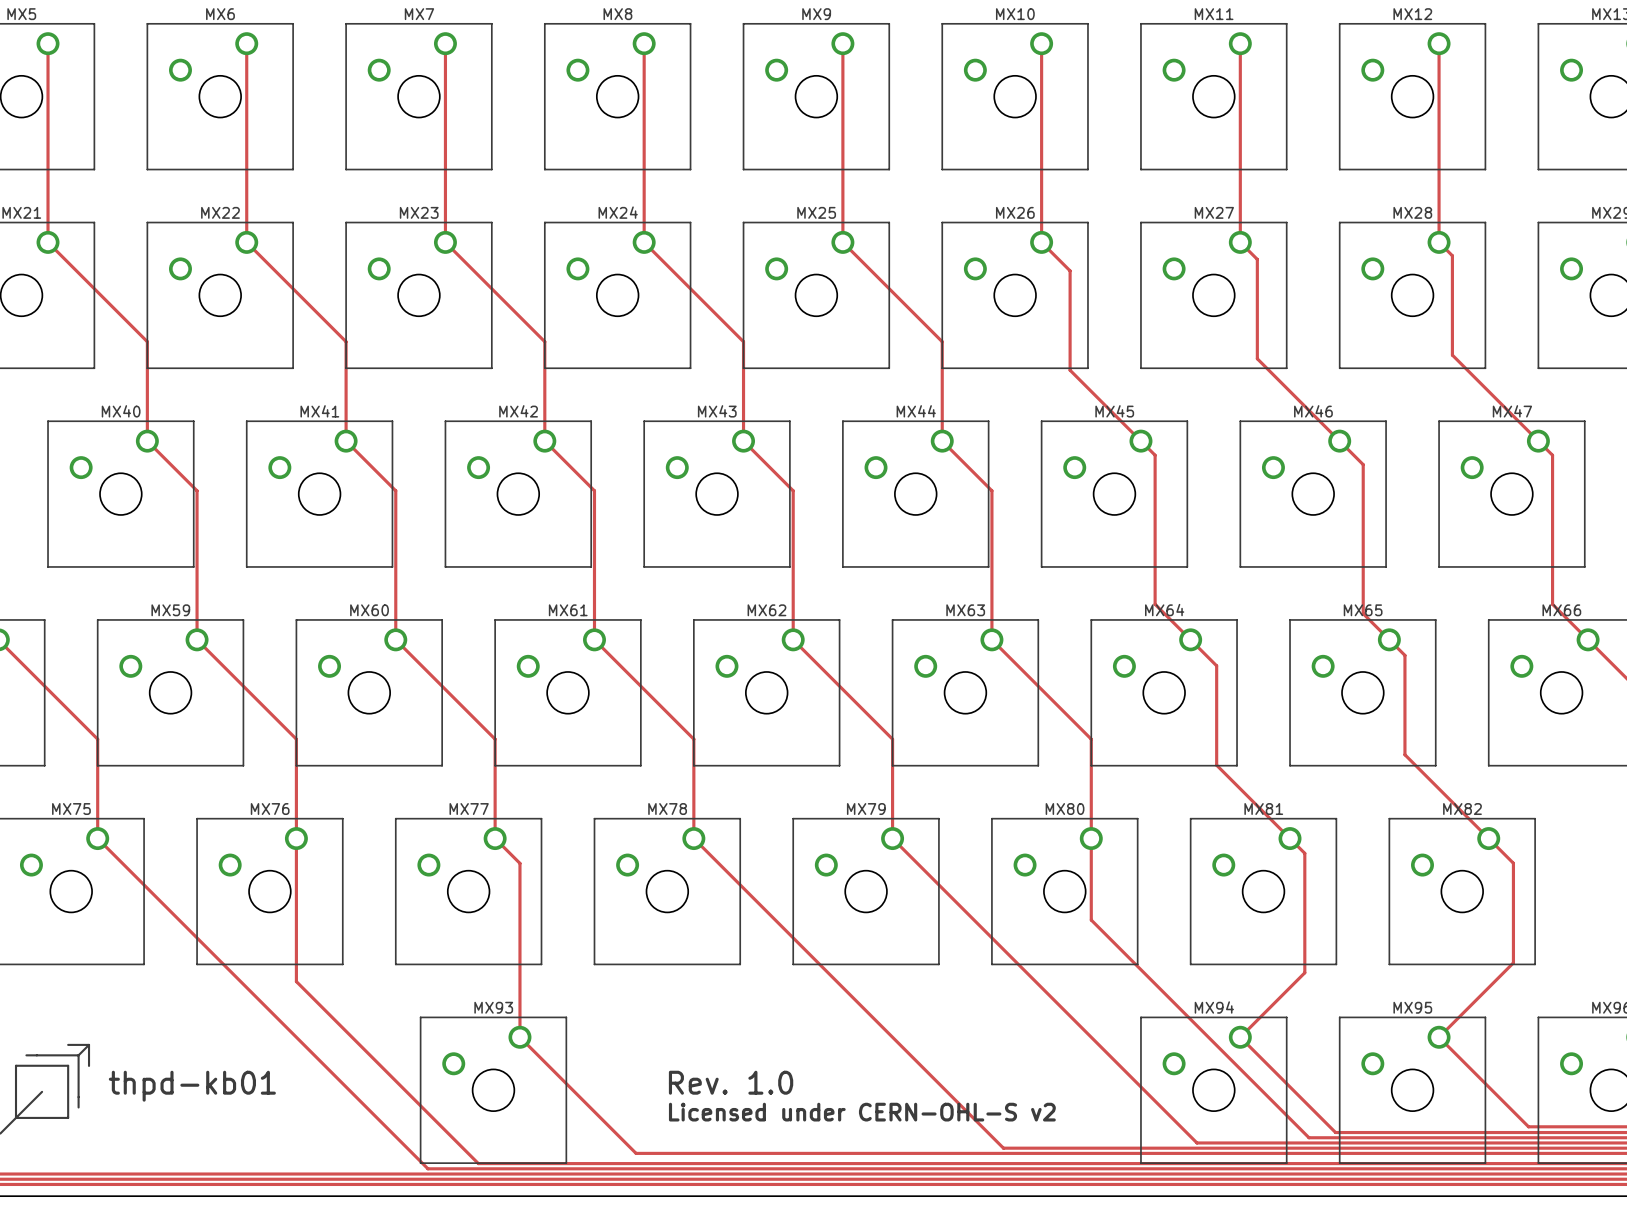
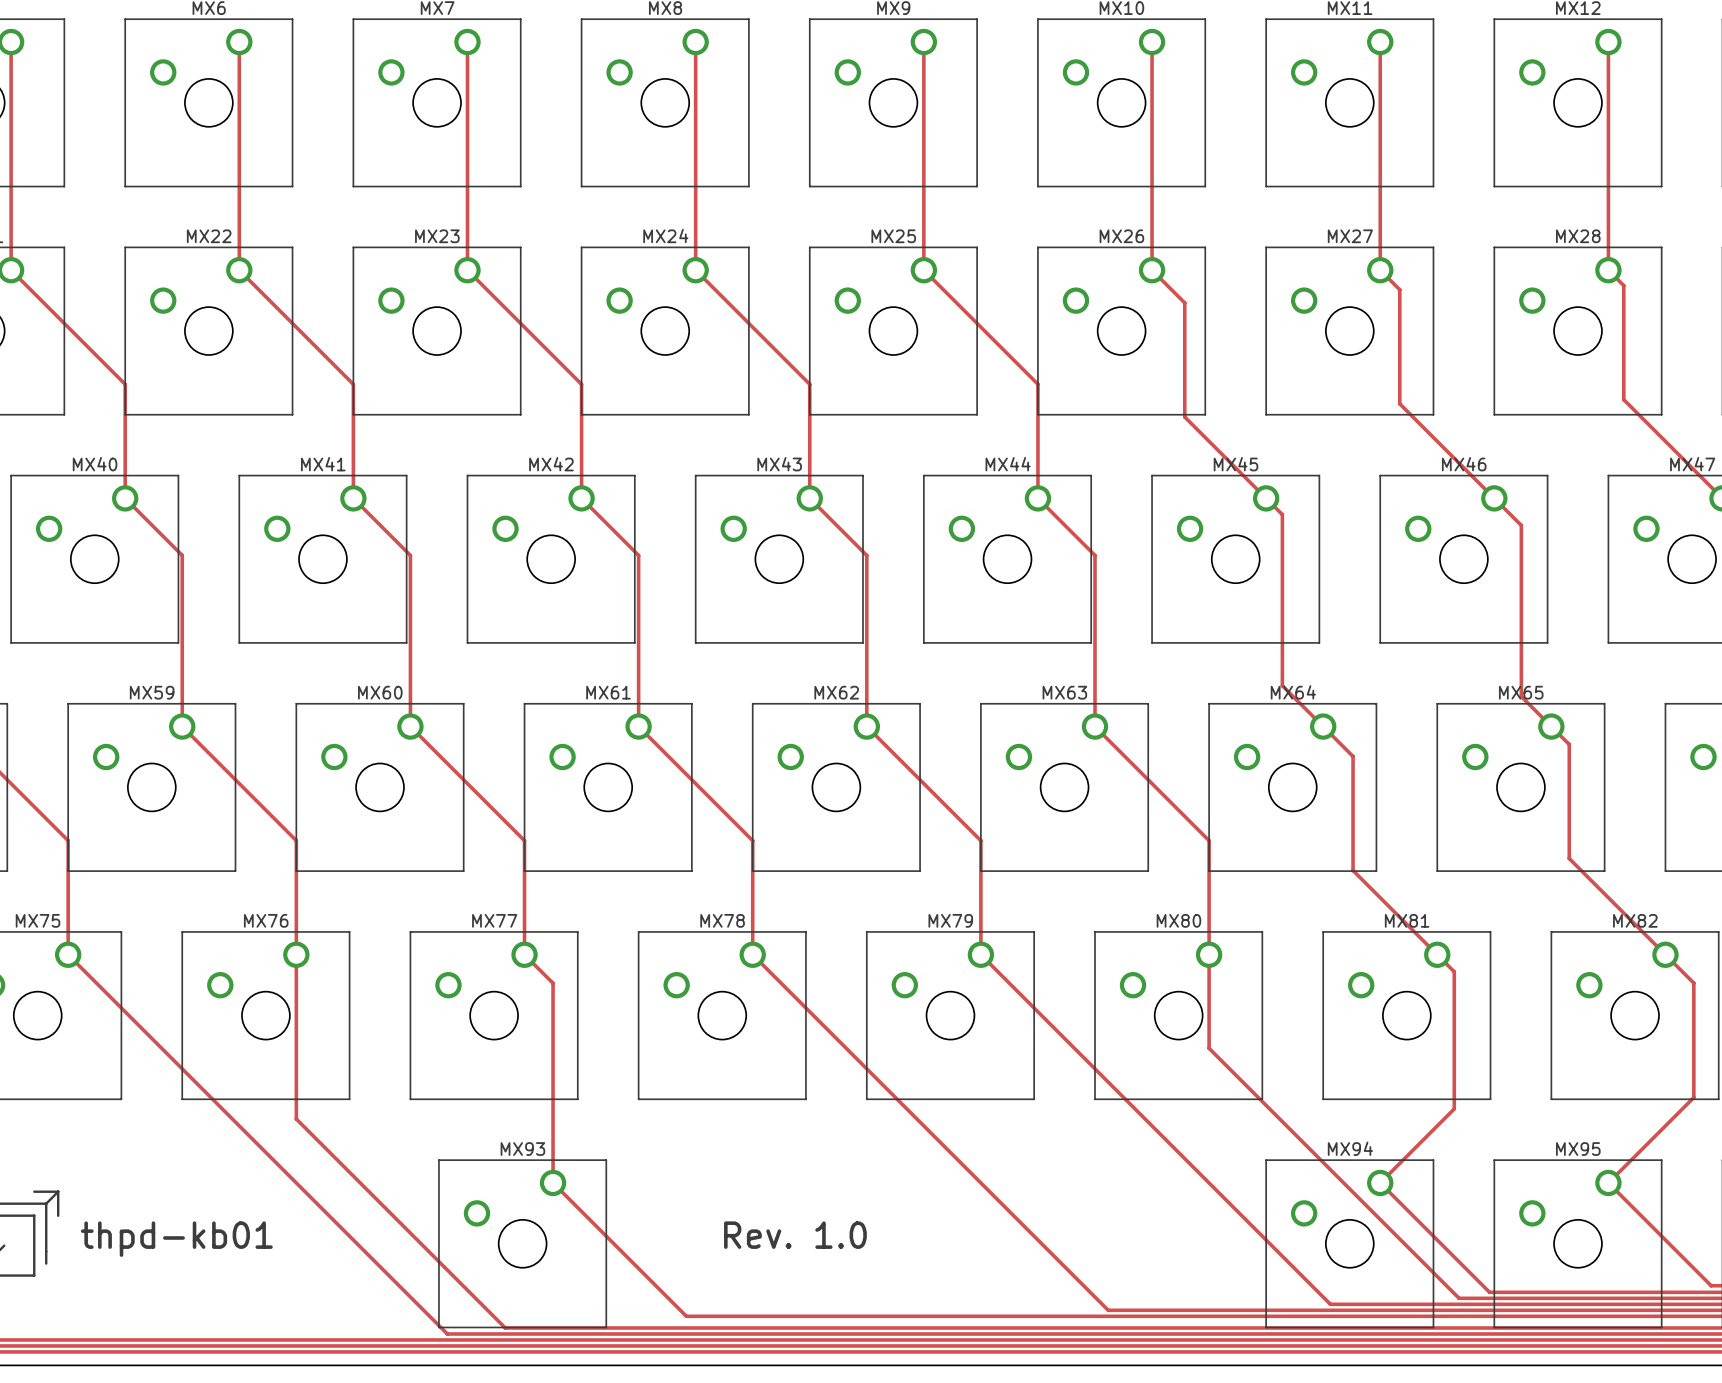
text: Licensed under CERN-OHL-S v2 (862, 1112) -> none

